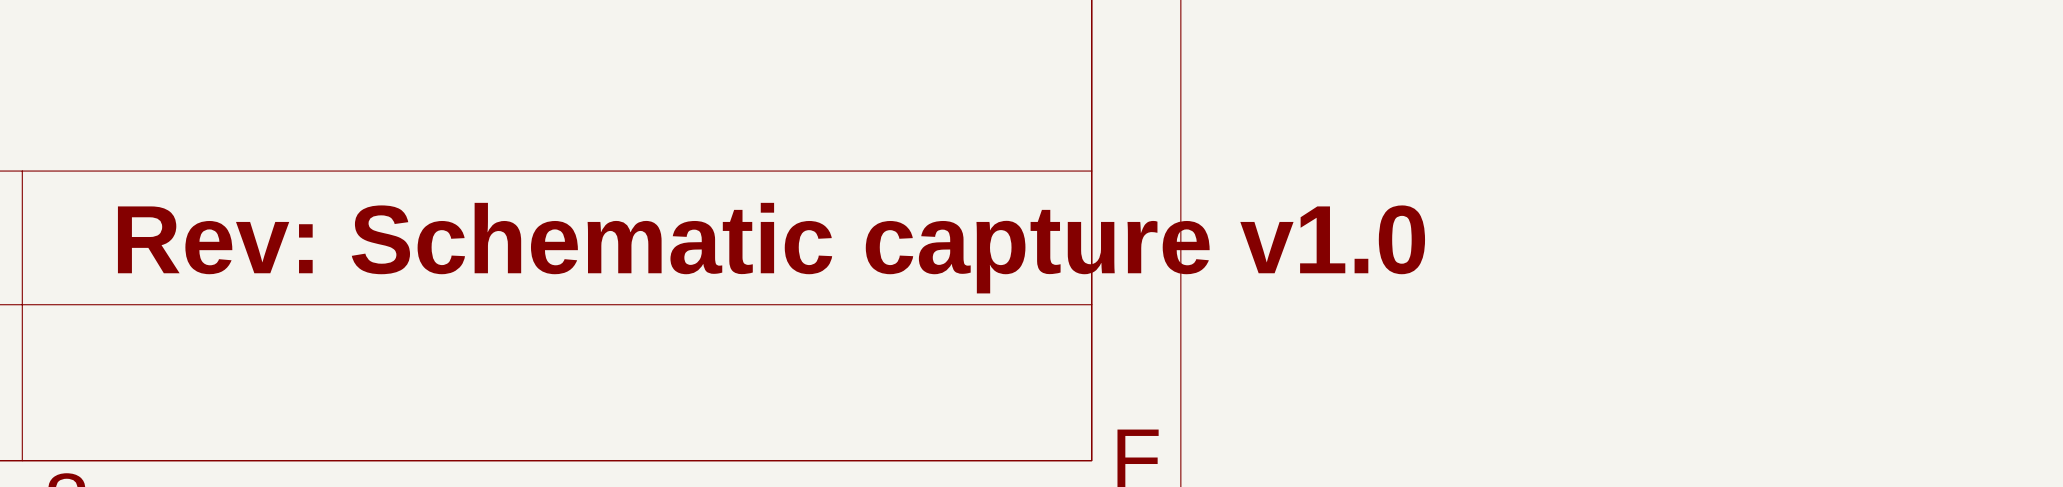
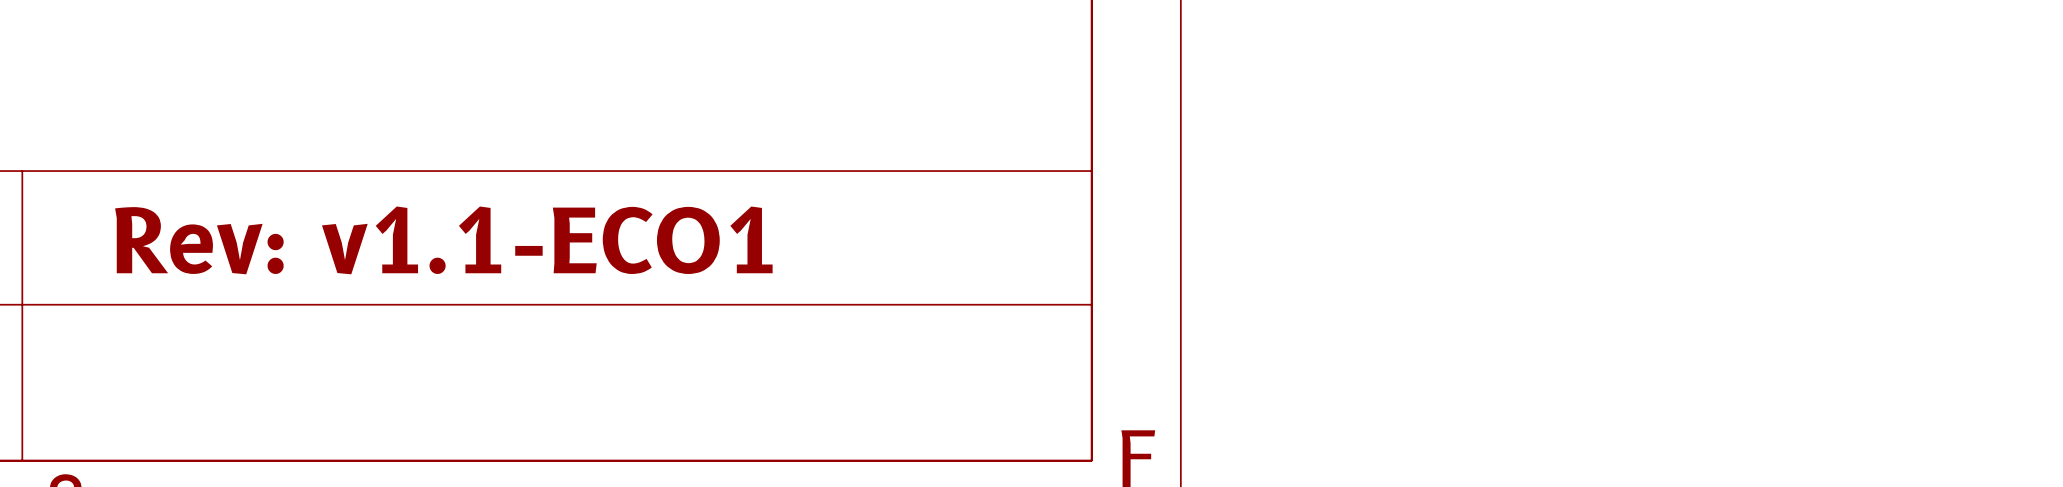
title block: Rev: Schematic capture v1.0 (771, 248) -> Rev: v1.1-ECO1 (443, 240)

